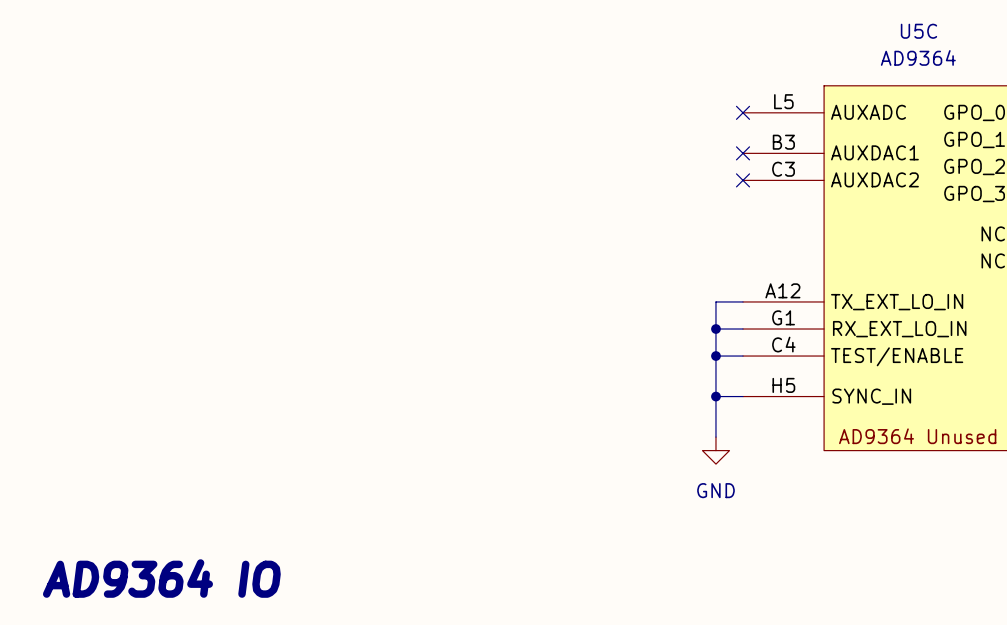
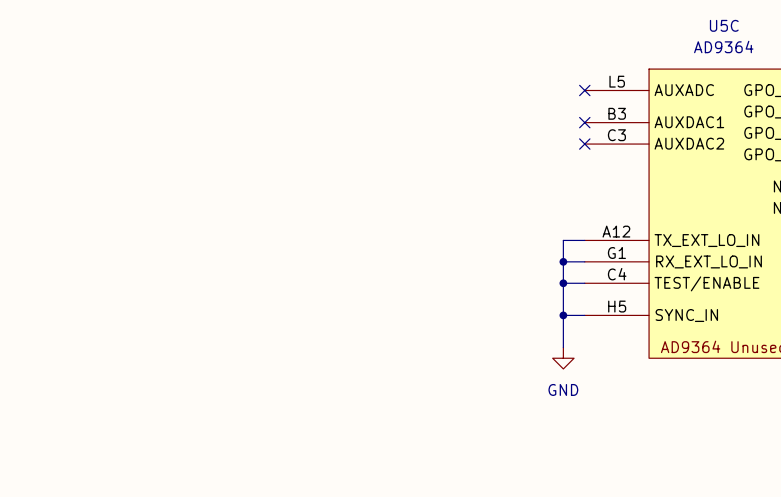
text: AD9364 IO (161, 578) -> none

